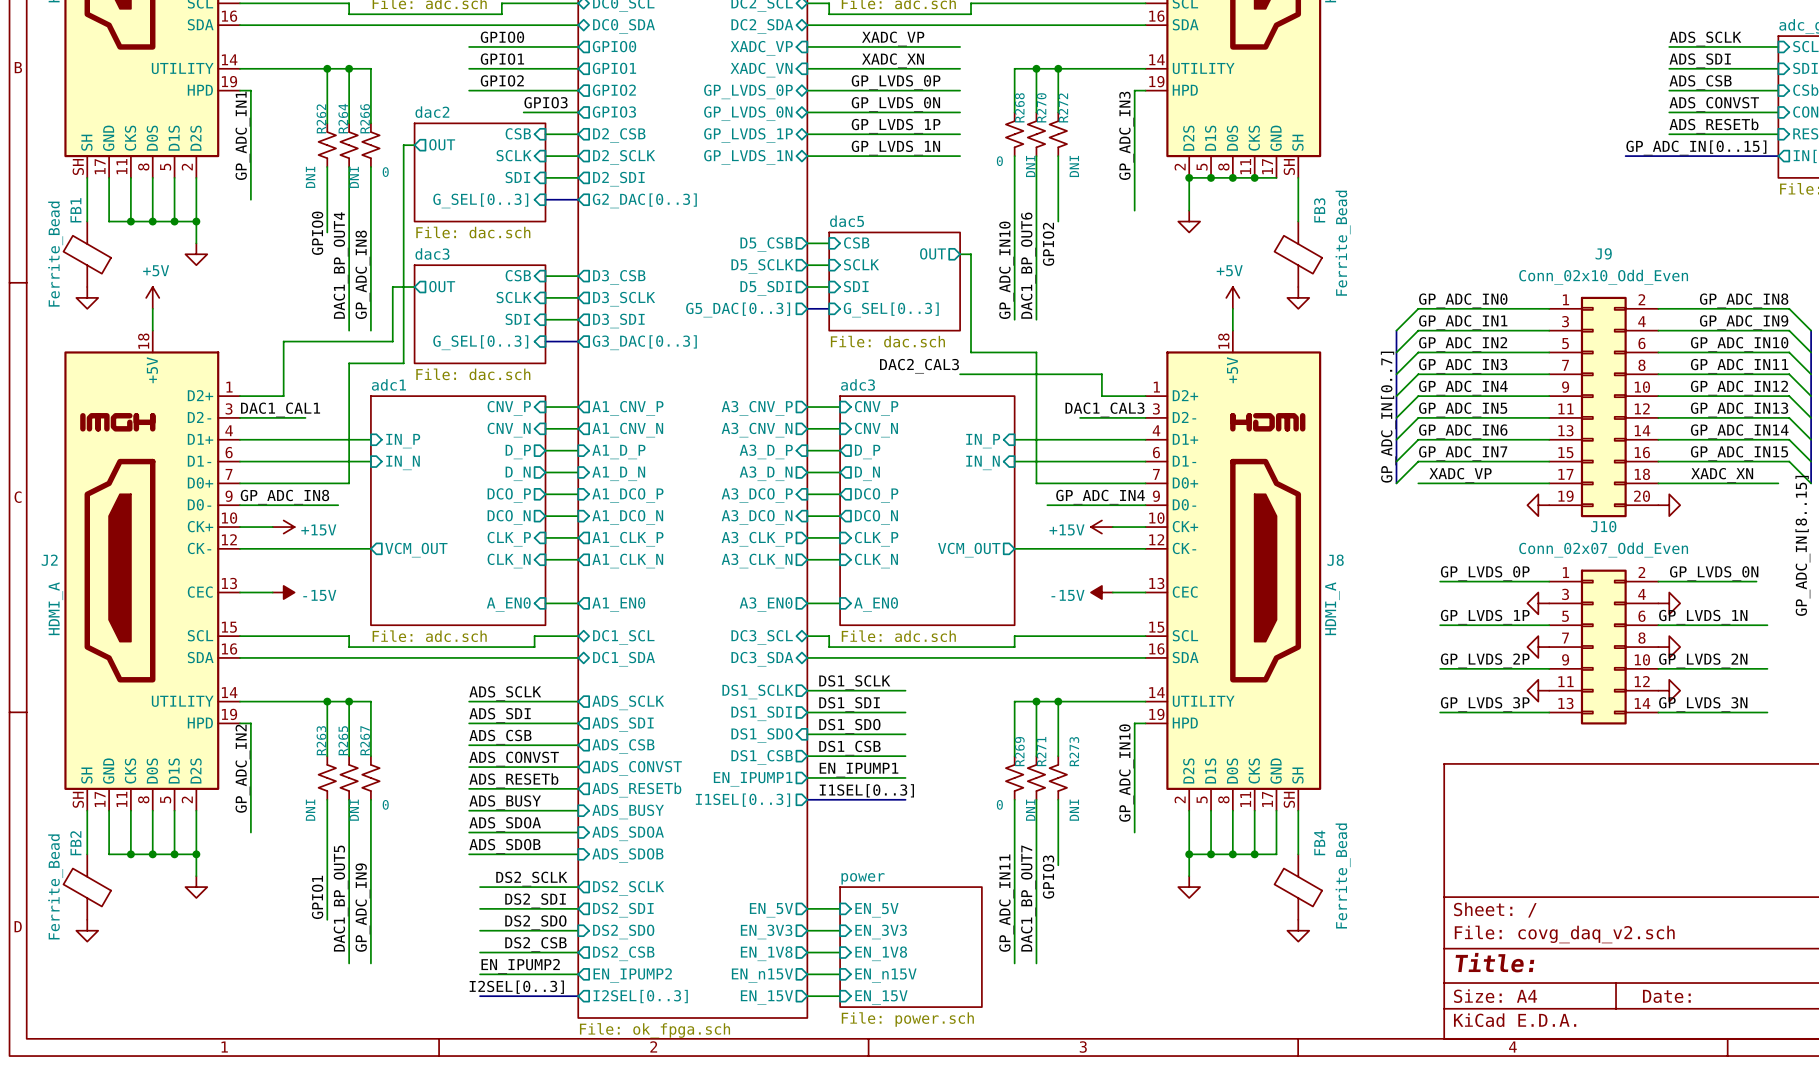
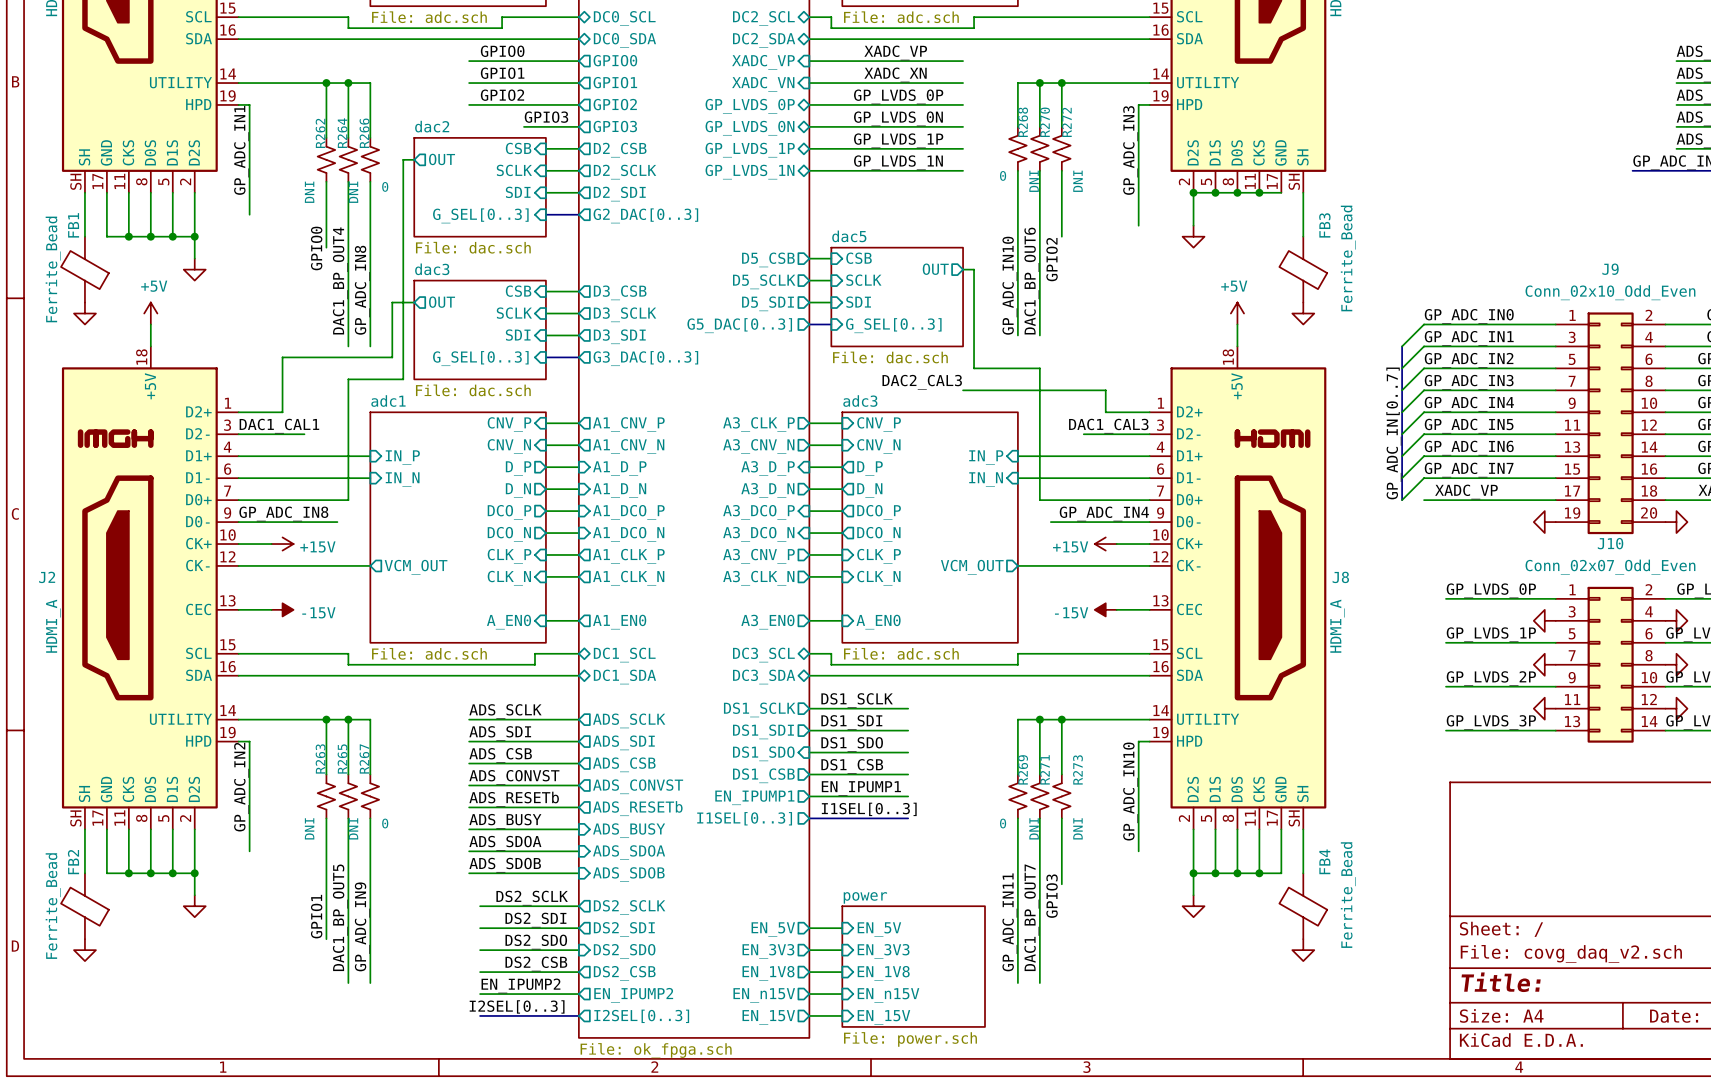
sheet pin: A3_CNV_P (757, 408) -> A3_CLK_P (758, 424)
sheet pin: A3_CLK_P (757, 539) -> A3_CNV_P (758, 556)

